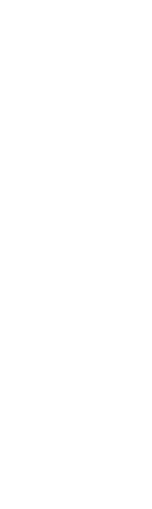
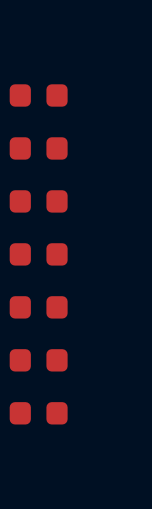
part: none -> (38, 95)
part: none -> (38, 148)
part: none -> (38, 201)
part: none -> (38, 254)
part: none -> (38, 307)
part: none -> (38, 360)
part: none -> (38, 413)

